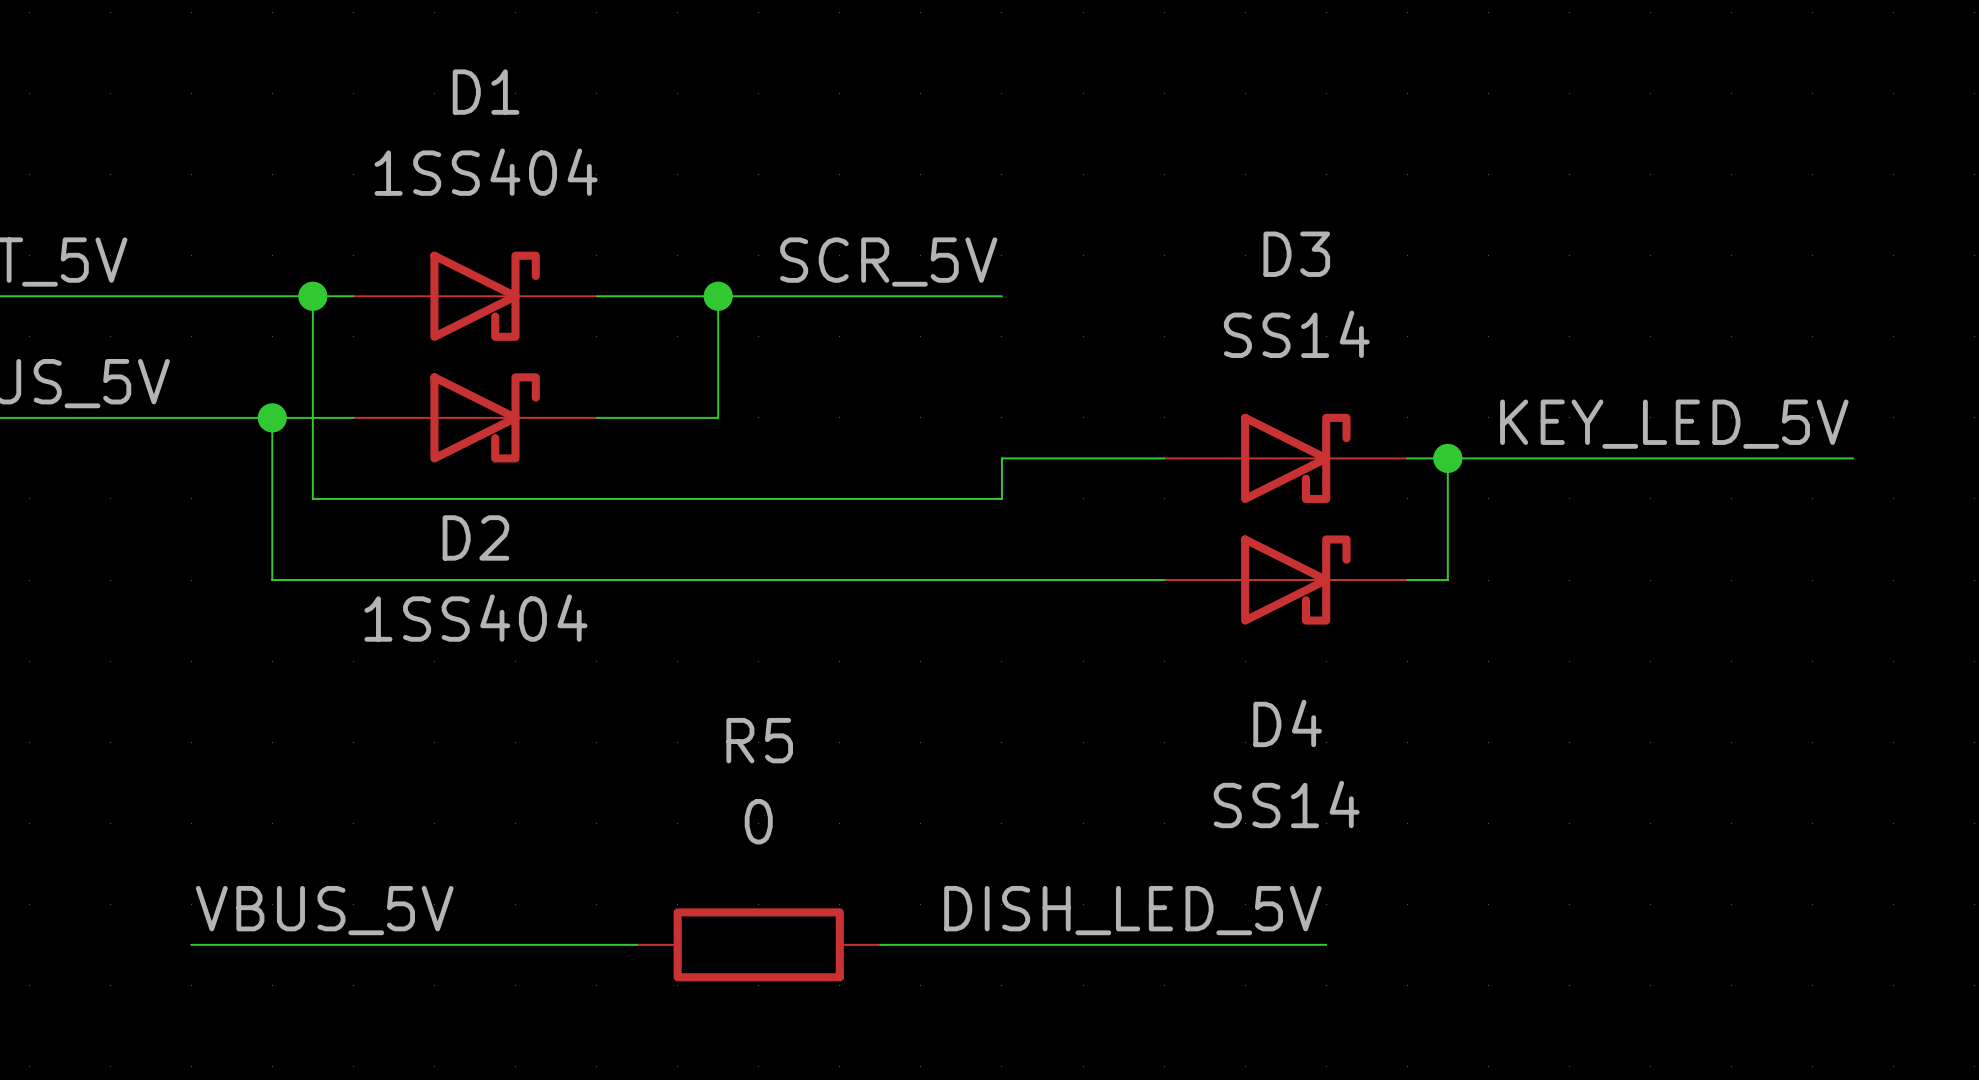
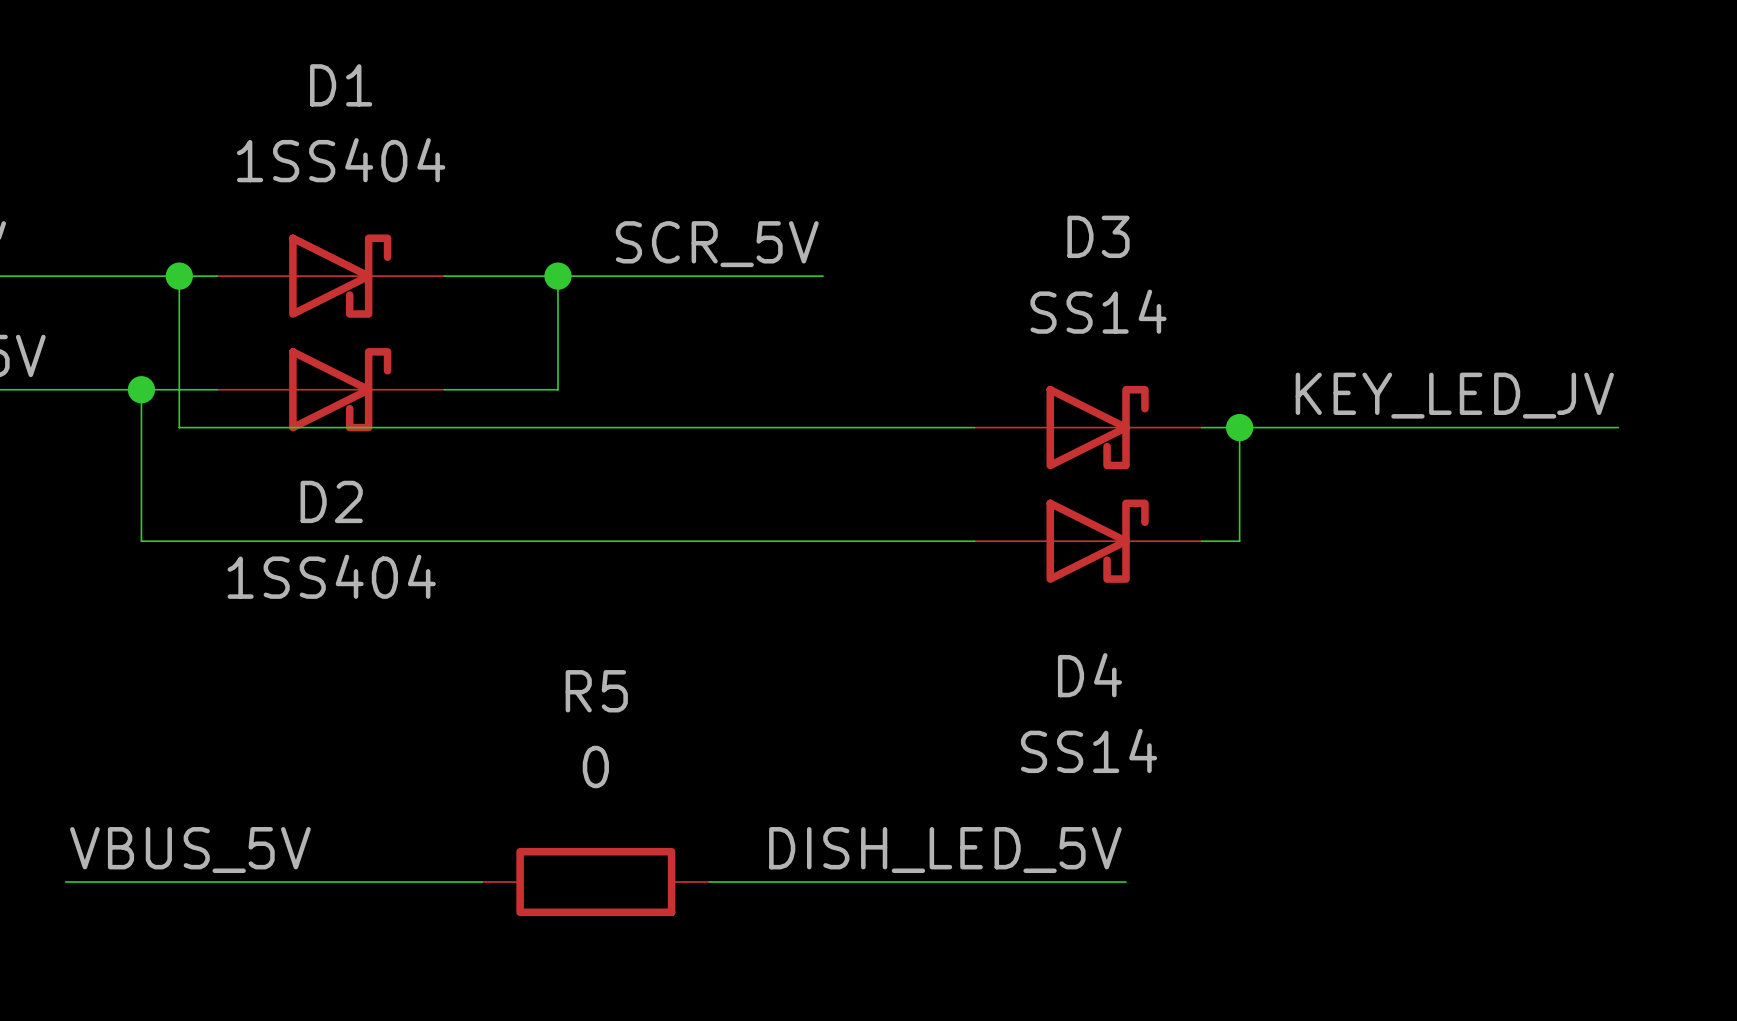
label: KEY_LED_5V (1674, 424) -> KEY_LED_JV (1454, 395)
wire: (312, 458) (312, 498) (1001, 498) (1001, 458) -> (179, 427) (823, 427)

